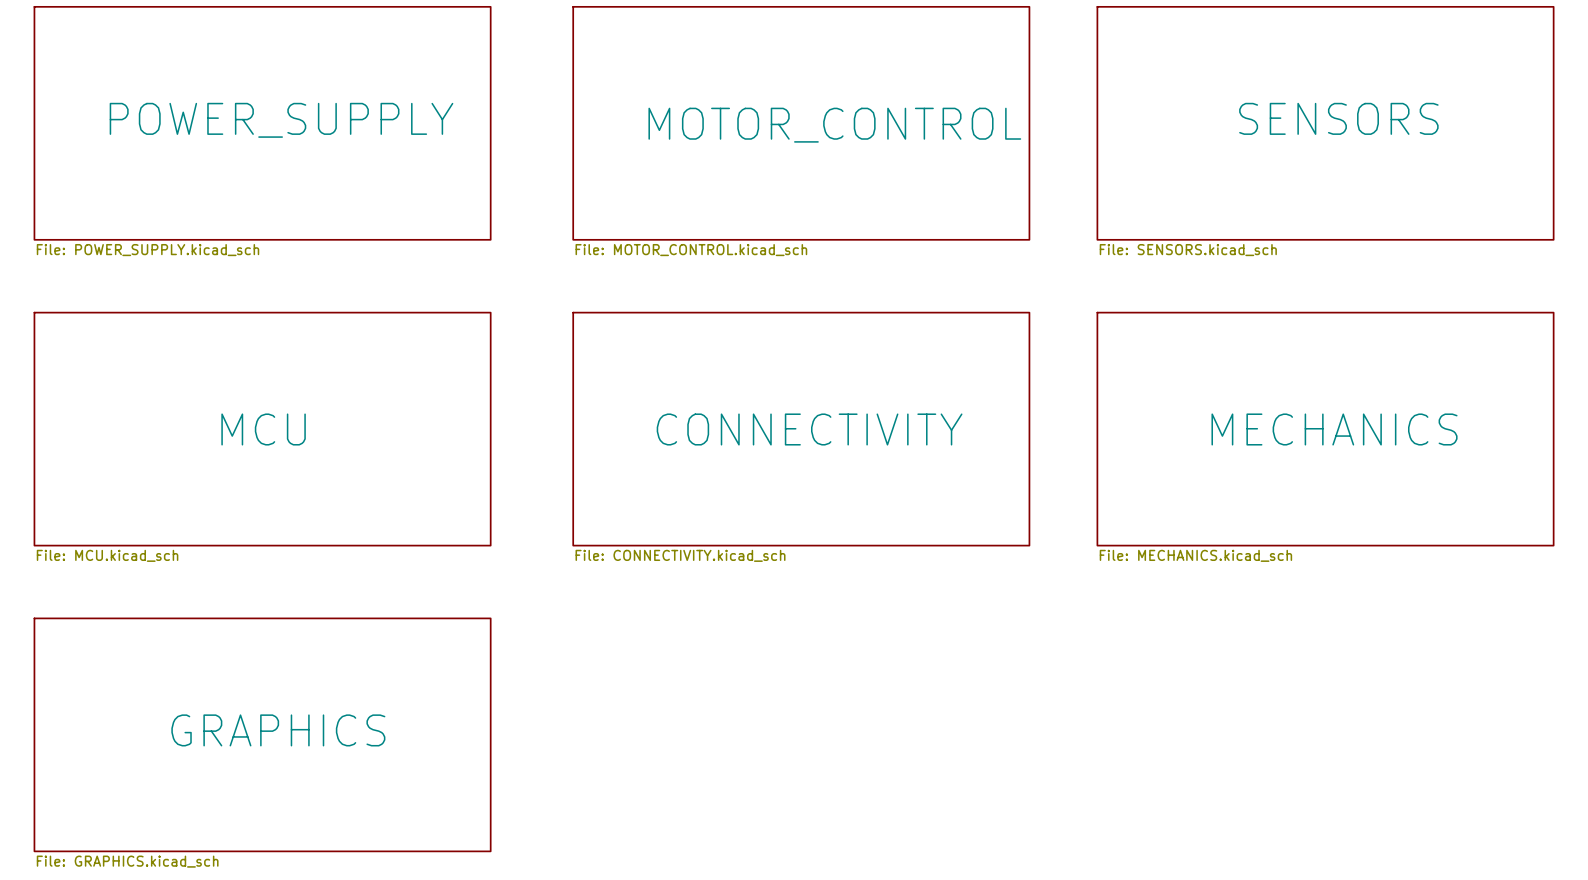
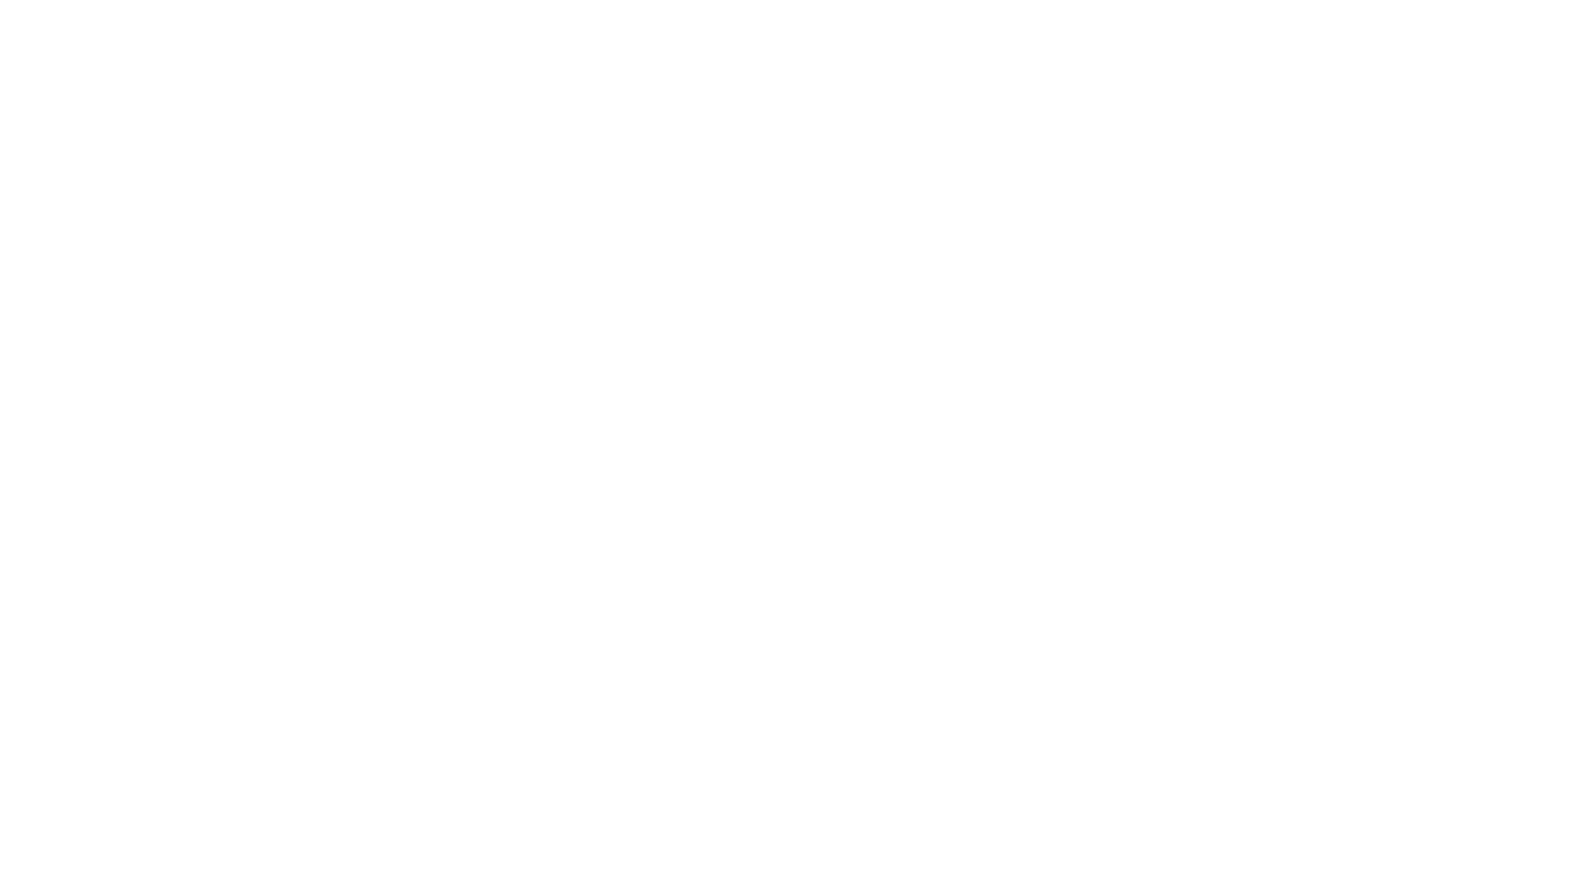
sheet POWER_SUPPLY: File: POWER_SUPPLY.kicad_sch (262, 123) -> none
sheet MOTOR_CONTROL: File: MOTOR_CONTROL.kicad_sch (801, 123) -> none
sheet SENSORS: File: SENSORS.kicad_sch (1325, 123) -> none
sheet MCU: File: MCU.kicad_sch (262, 429) -> none
sheet CONNECTIVITY: File: CONNECTIVITY.kicad_sch (801, 429) -> none
sheet MECHANICS: File: MECHANICS.kicad_sch (1325, 429) -> none
sheet GRAPHICS: File: GRAPHICS.kicad_sch (262, 734) -> none

